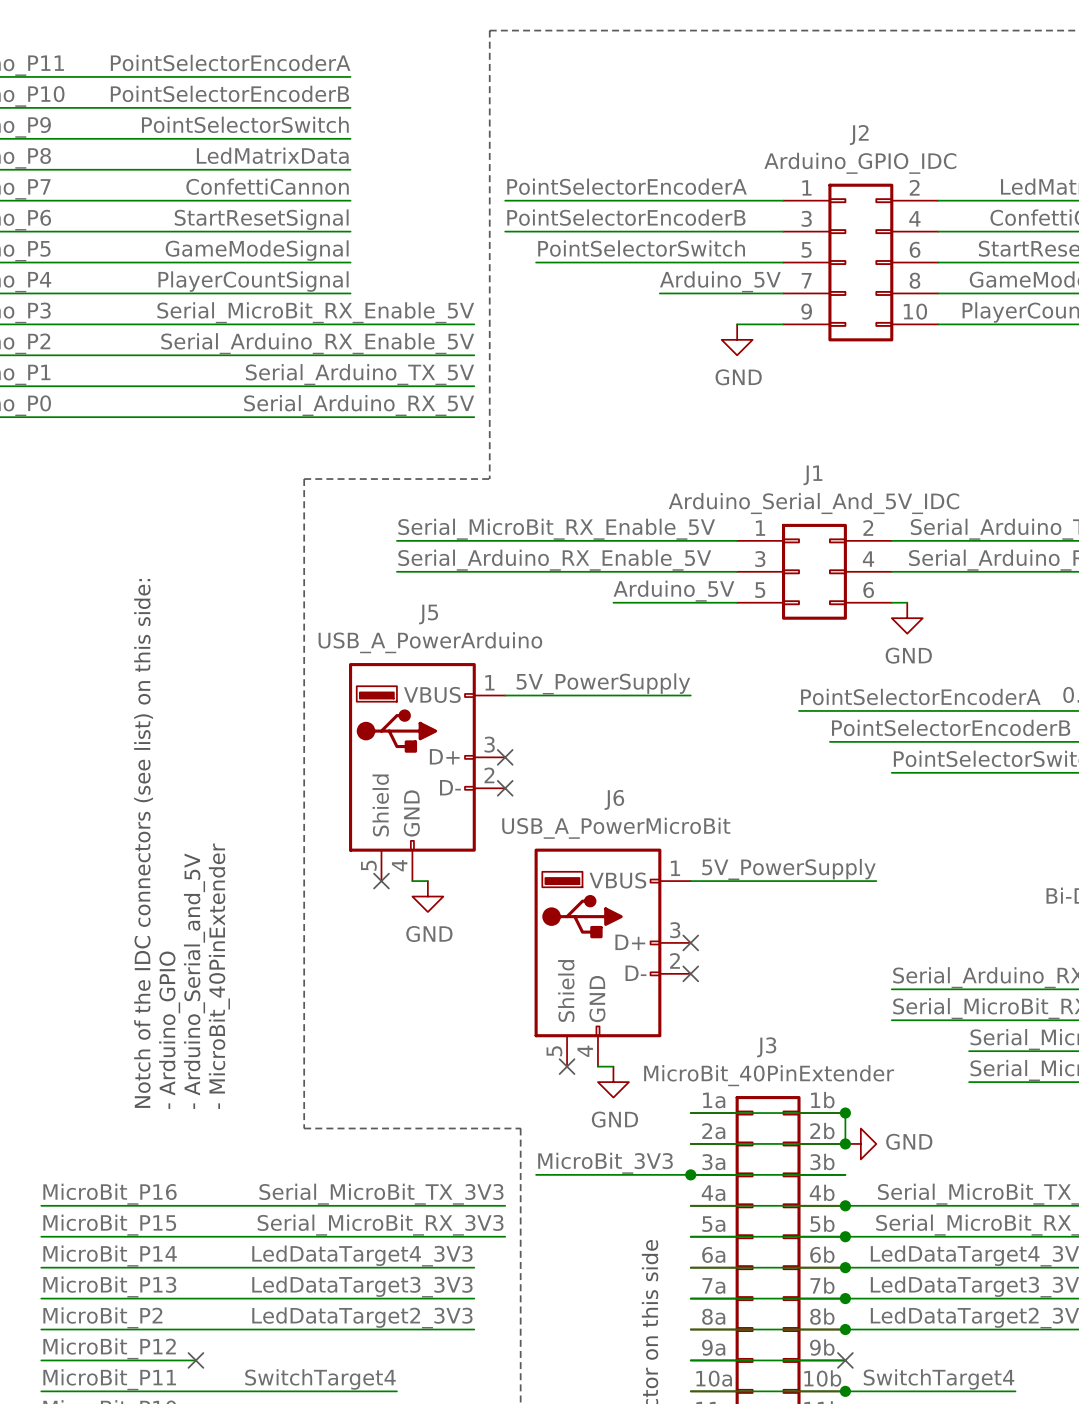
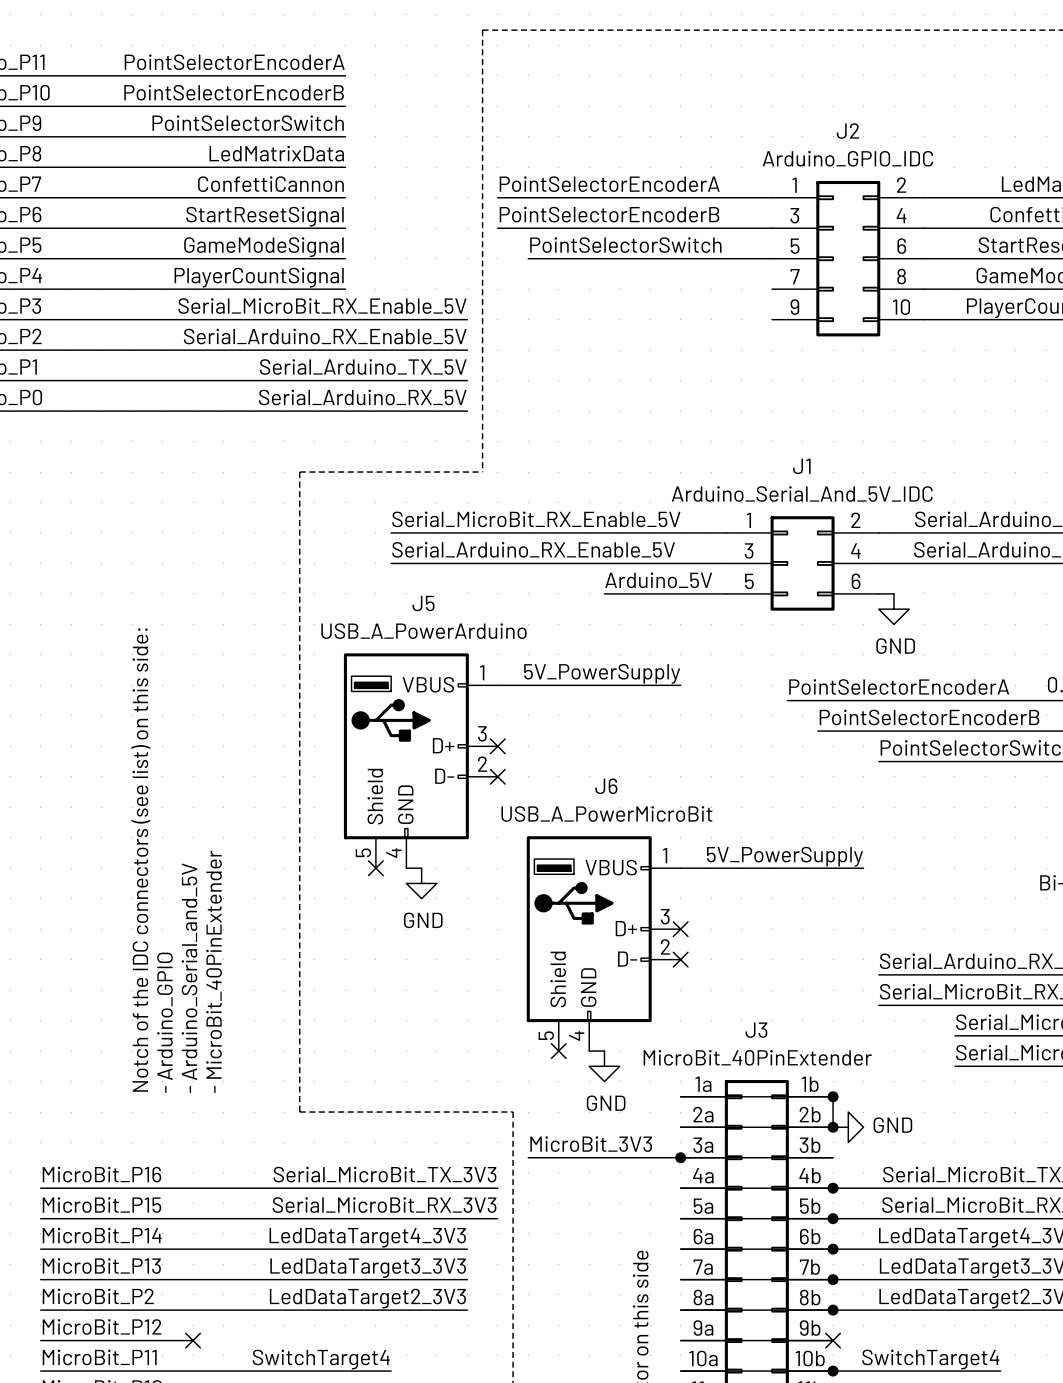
label: Arduino_5V (720, 281) -> none
wire: (659, 293) (783, 293) -> none
wire: (737, 324) (783, 324) -> none
power symbol: GND (737, 339) -> none

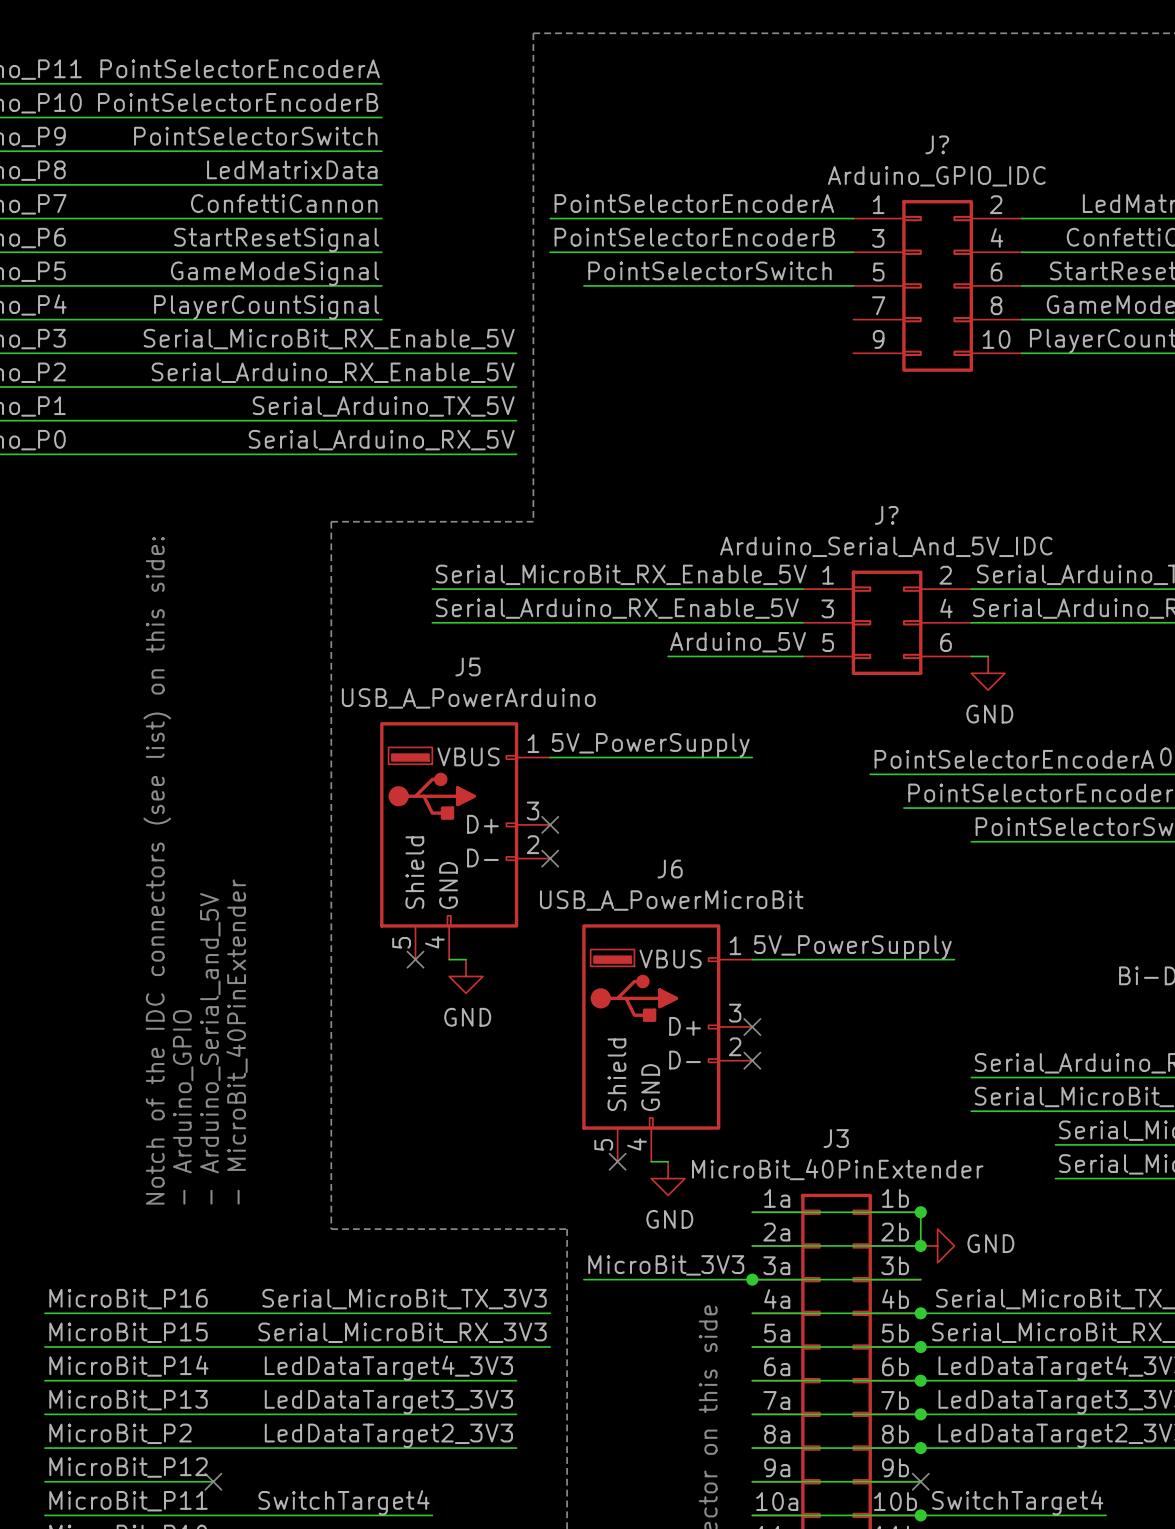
J2 name: J2 (847, 131) -> J? (937, 144)
J1 name: J1 (801, 466) -> J? (886, 515)

